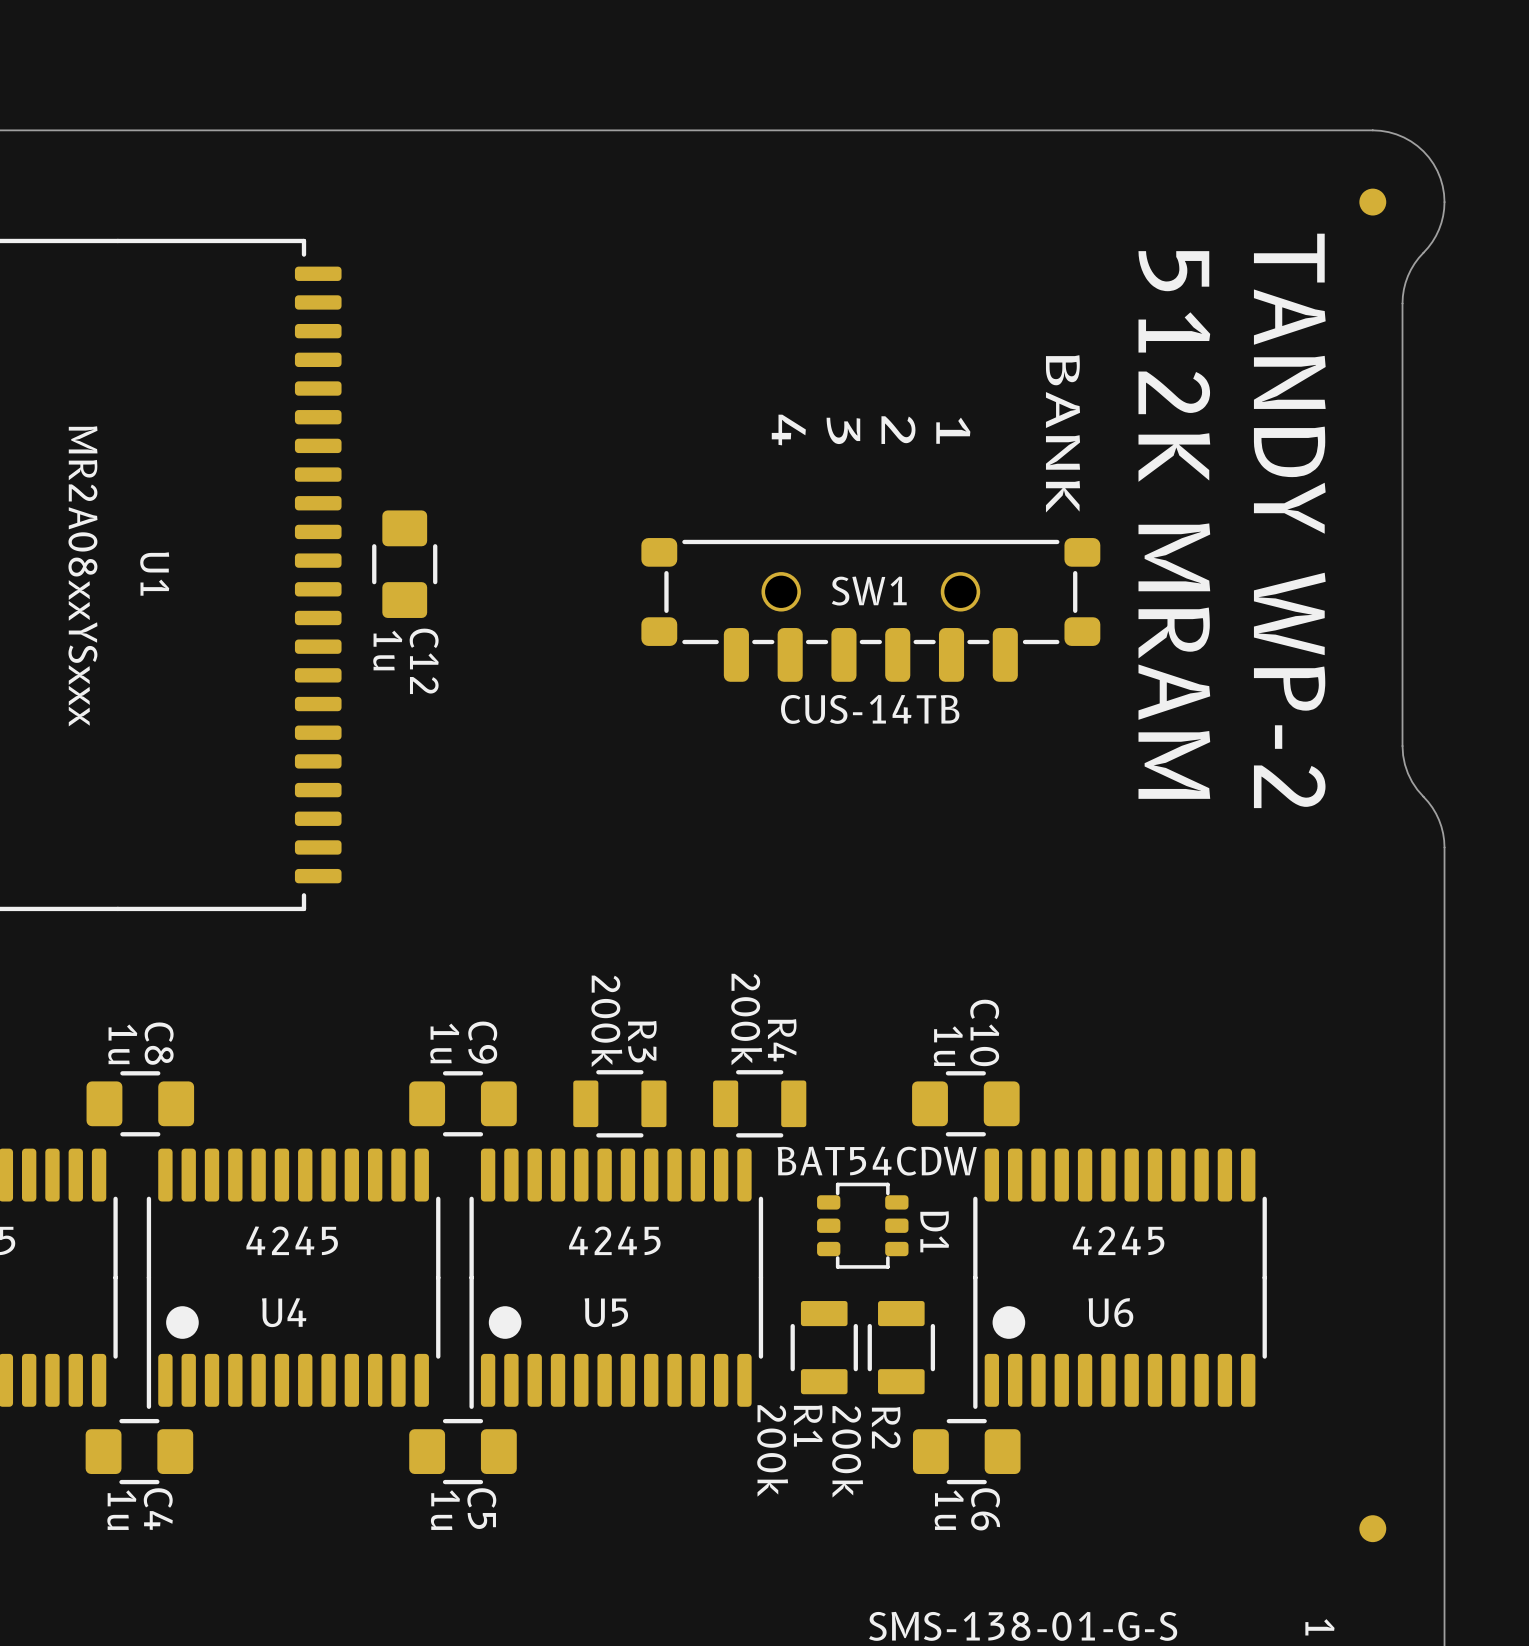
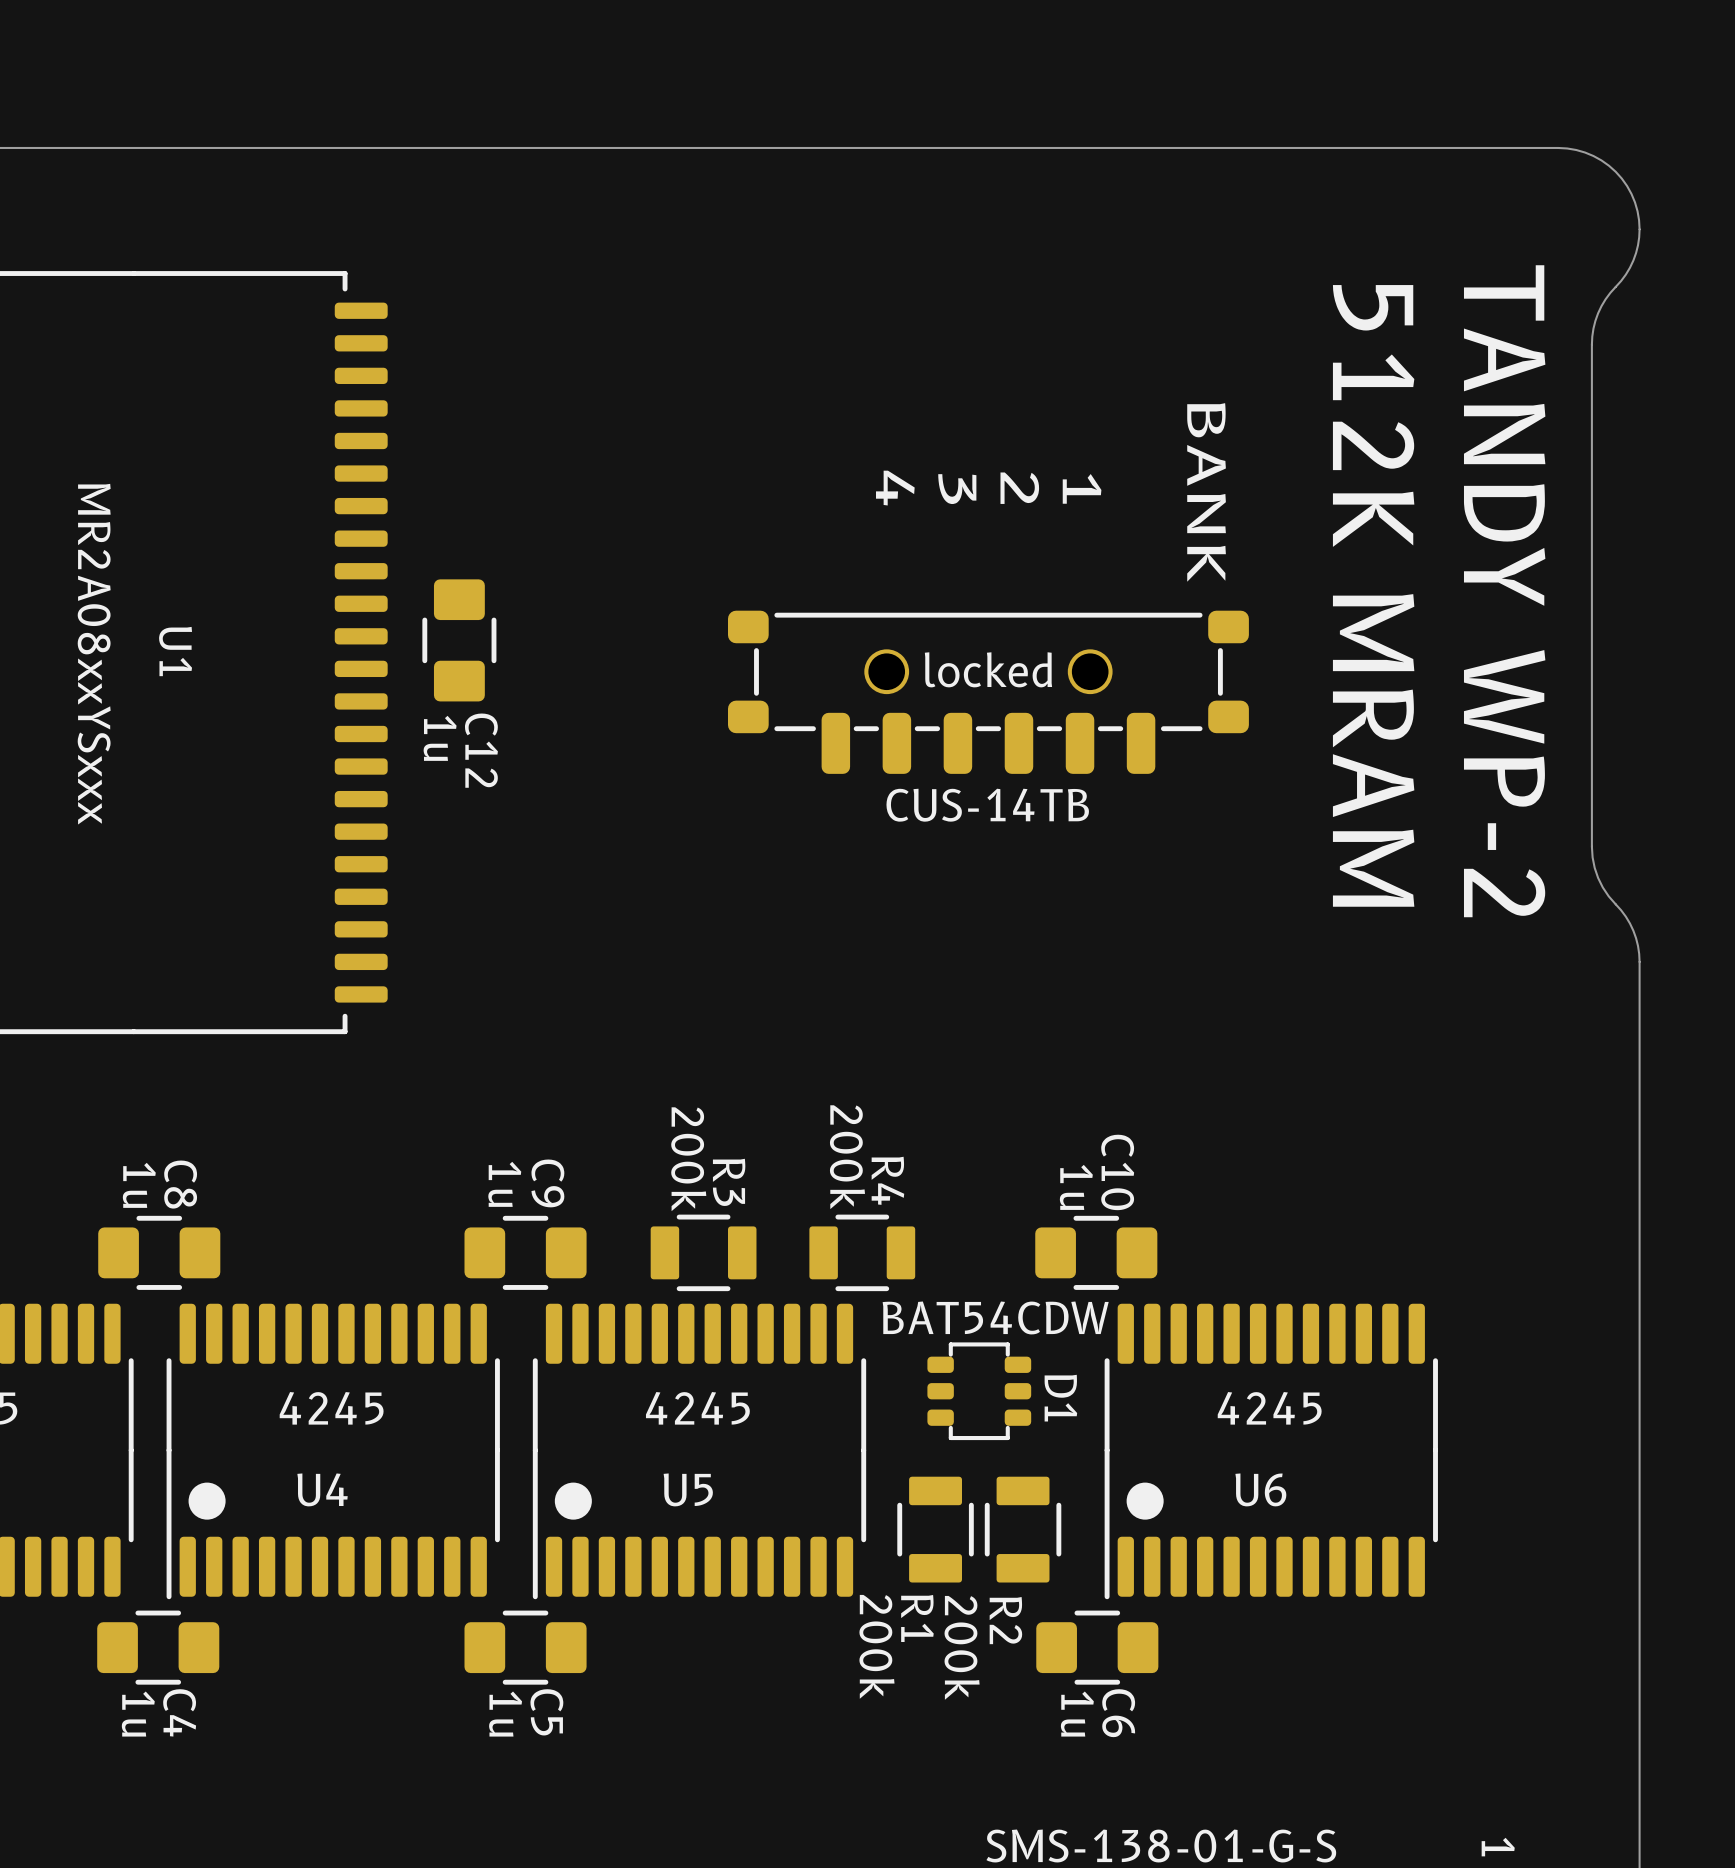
part: (1372, 202) -> none
text position: TANDY WP-2 (1289, 520) -> TANDY WP-2 (1504, 591)
text position: 512K MRAM (1174, 524) -> 512K MRAM (1373, 595)
SW1 name: SW1 (869, 591) -> locked (988, 669)
part: (1372, 1528) -> none

